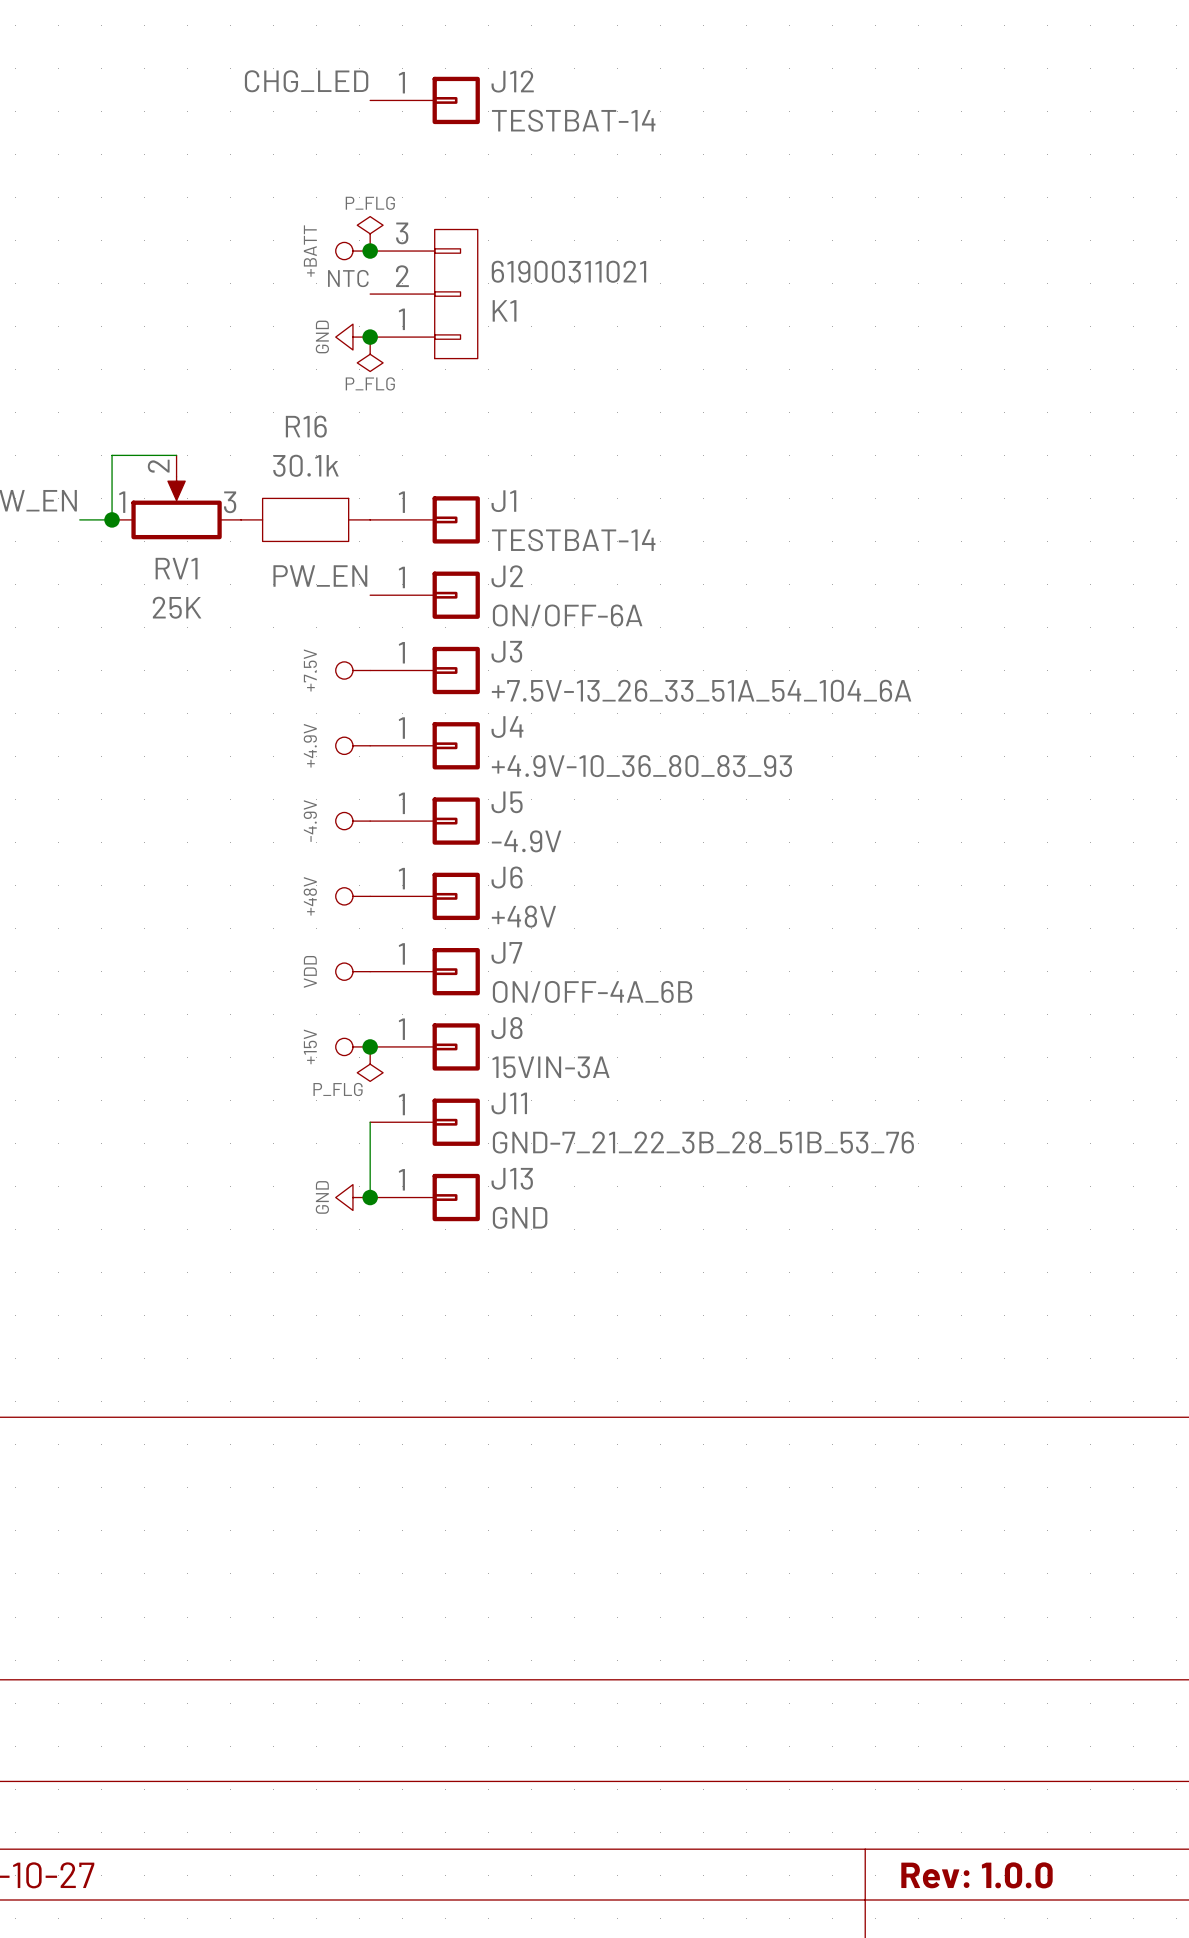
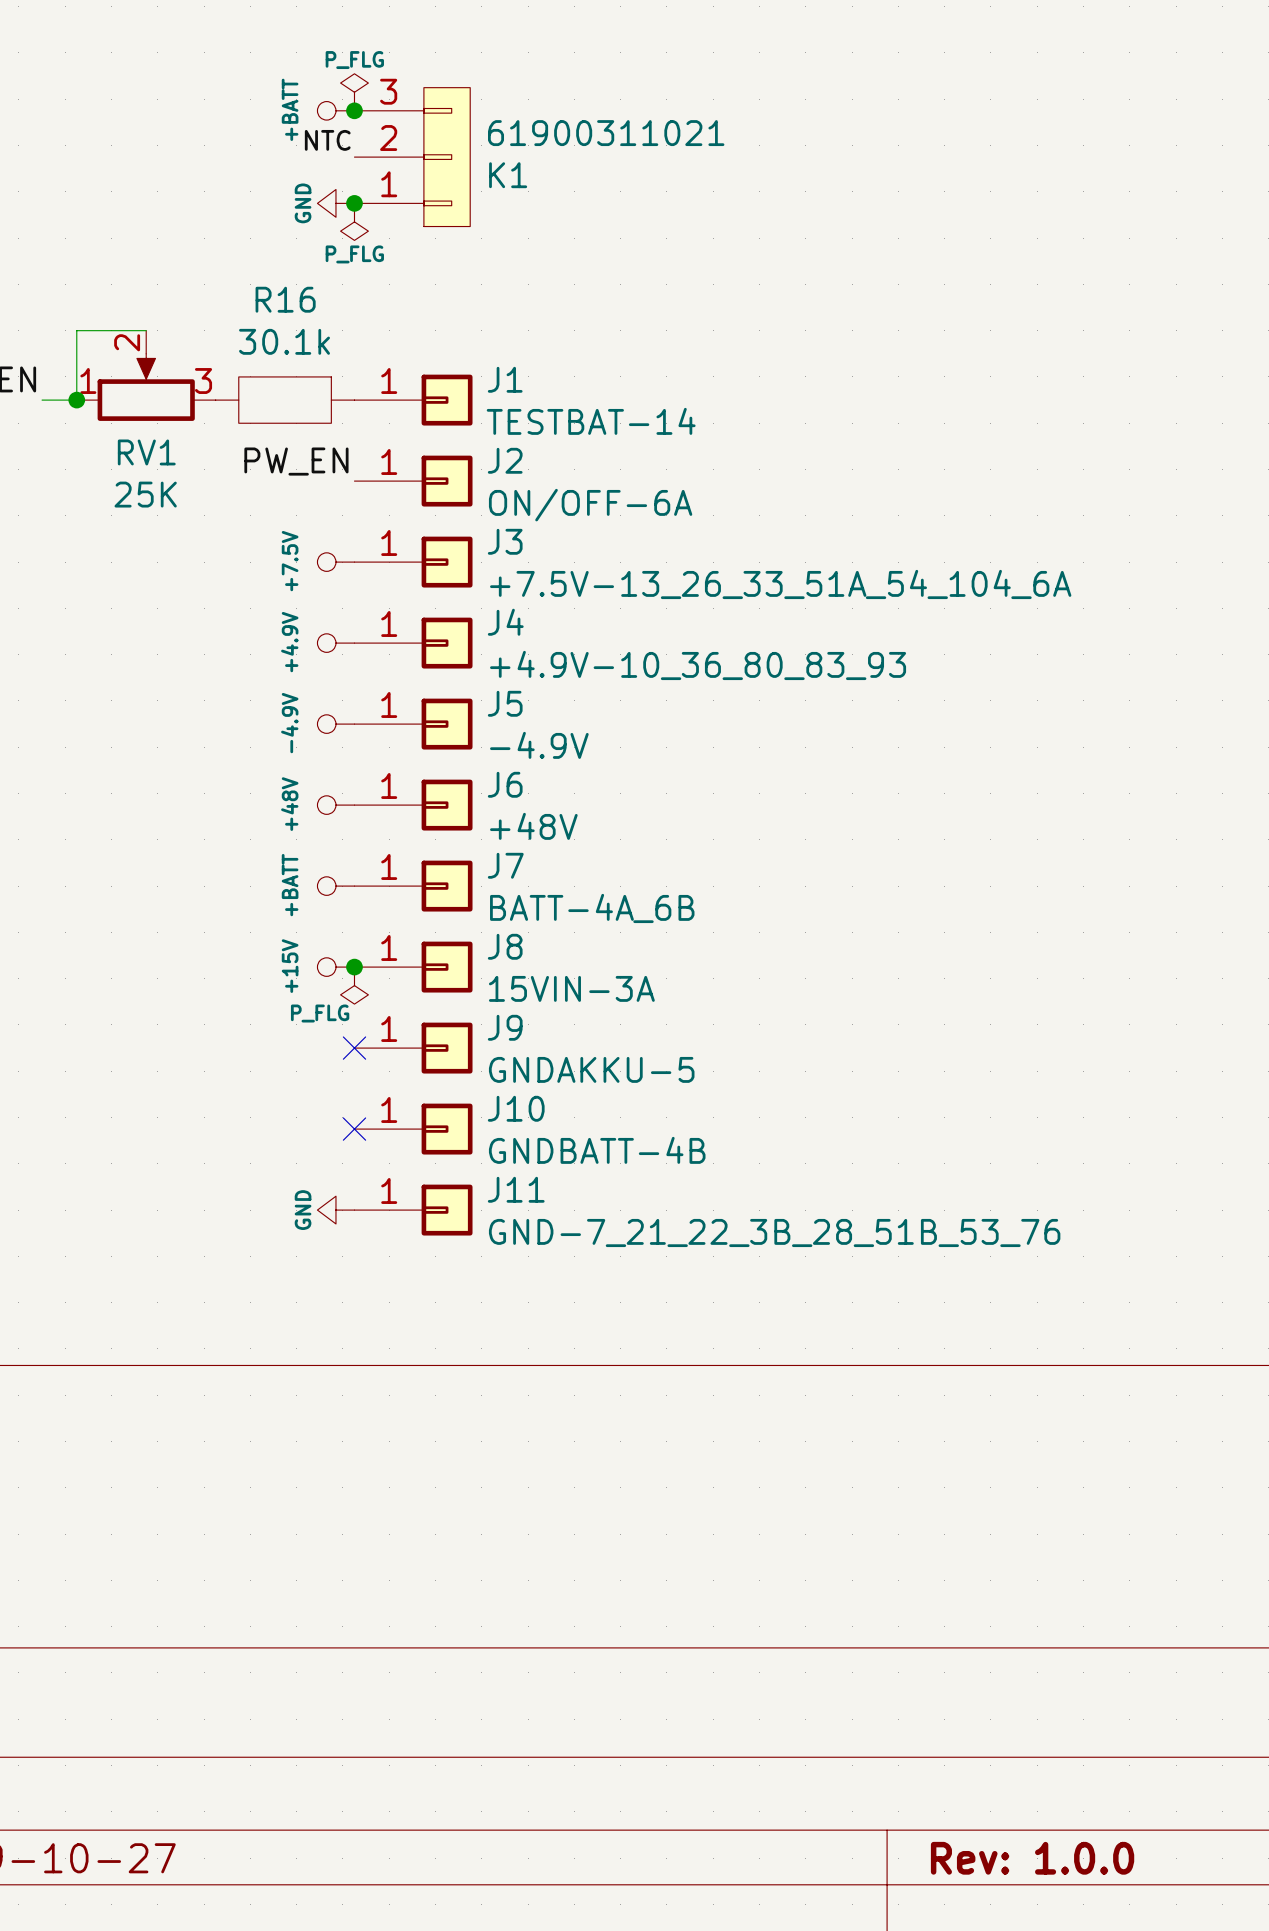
power symbol: VDD (352, 971) -> +BATT (335, 886)
J7 value: ON/OFF-4A_6B (592, 991) -> BATT-4A_6B (592, 908)
J11 name: J11 (509, 1103) -> J9 (505, 1027)
wire: (370, 1122) (370, 1197) -> none
no-connect mark: none -> (354, 1048)
J11 value: GND-7_21_22_3B_28_51B_53_76 (703, 1142) -> GNDAKKU-5 (591, 1069)
J13 name: J13 (512, 1178) -> J10 (516, 1108)
power symbol position: GND (352, 1197) -> GND (335, 1210)
junction: (370, 1197) -> none
no-connect mark: none -> (354, 1129)
J13 value: GND (520, 1217) -> GNDBATT-4B (597, 1150)
J11: none -> GND-7_21_22_3B_28_51B_53_76 (413, 1210)

